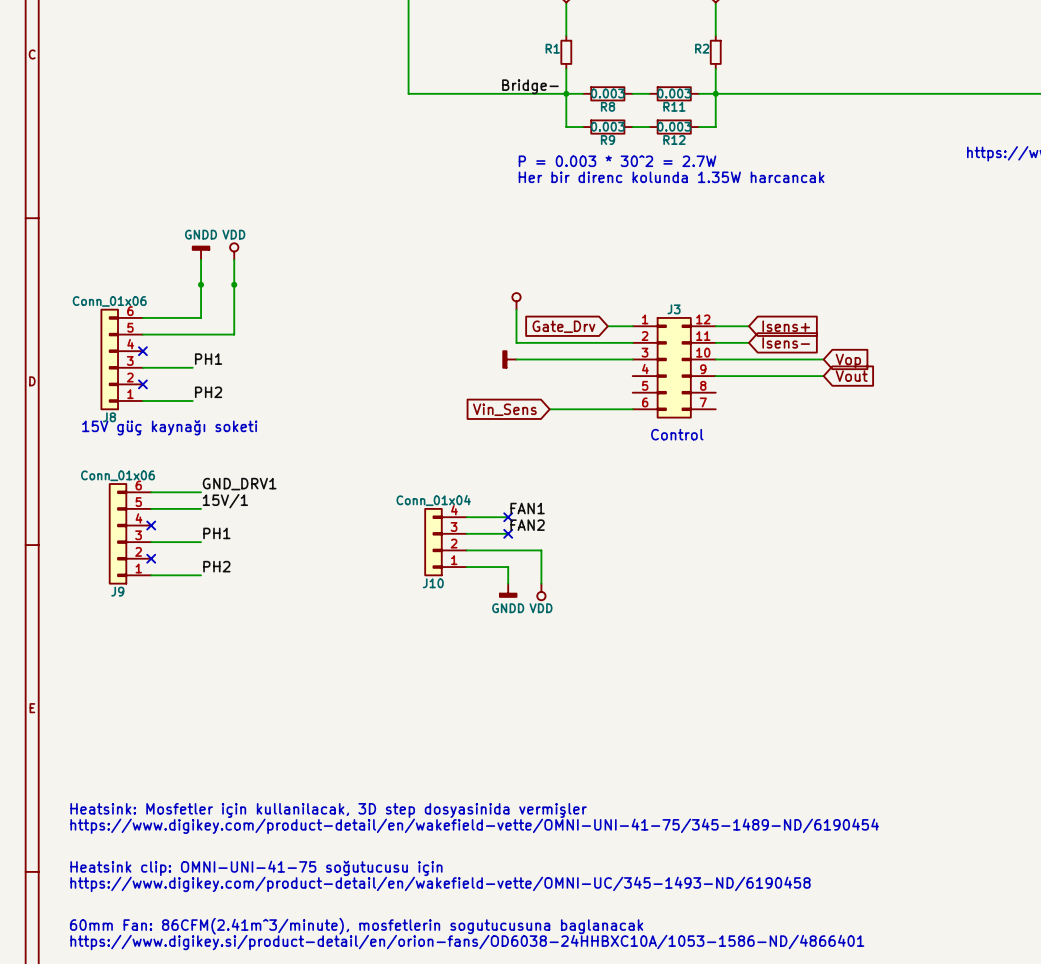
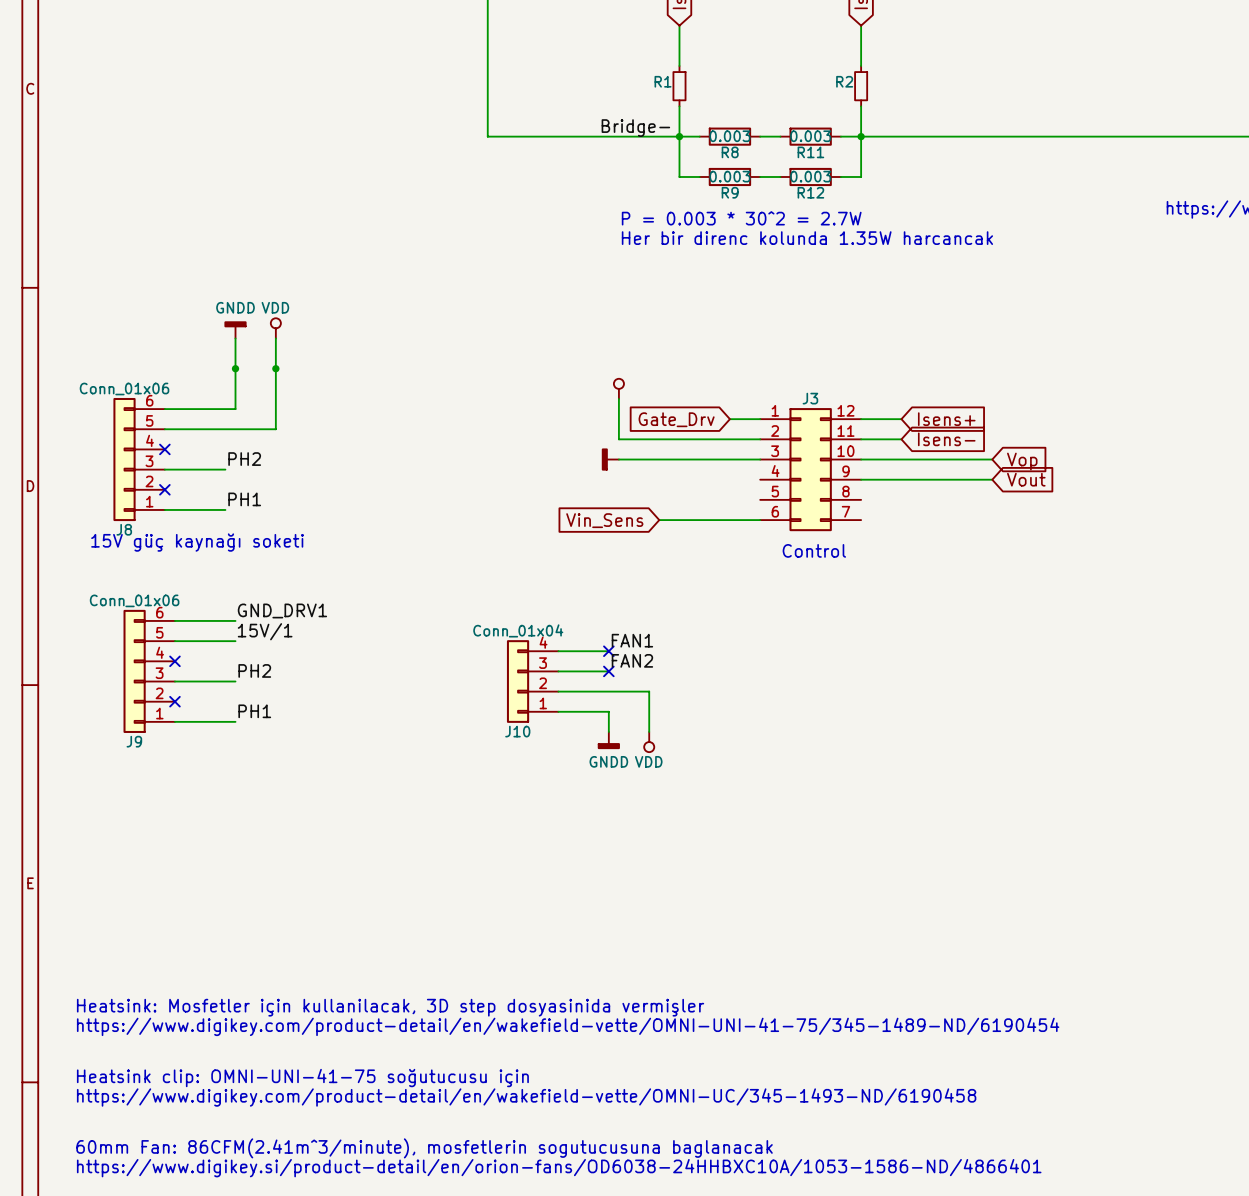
label: PH1 (208, 359) -> PH2 (244, 459)
label: PH2 (208, 392) -> PH1 (244, 499)
label: PH1 (216, 533) -> PH2 (254, 670)
label: PH2 (216, 566) -> PH1 (254, 711)

